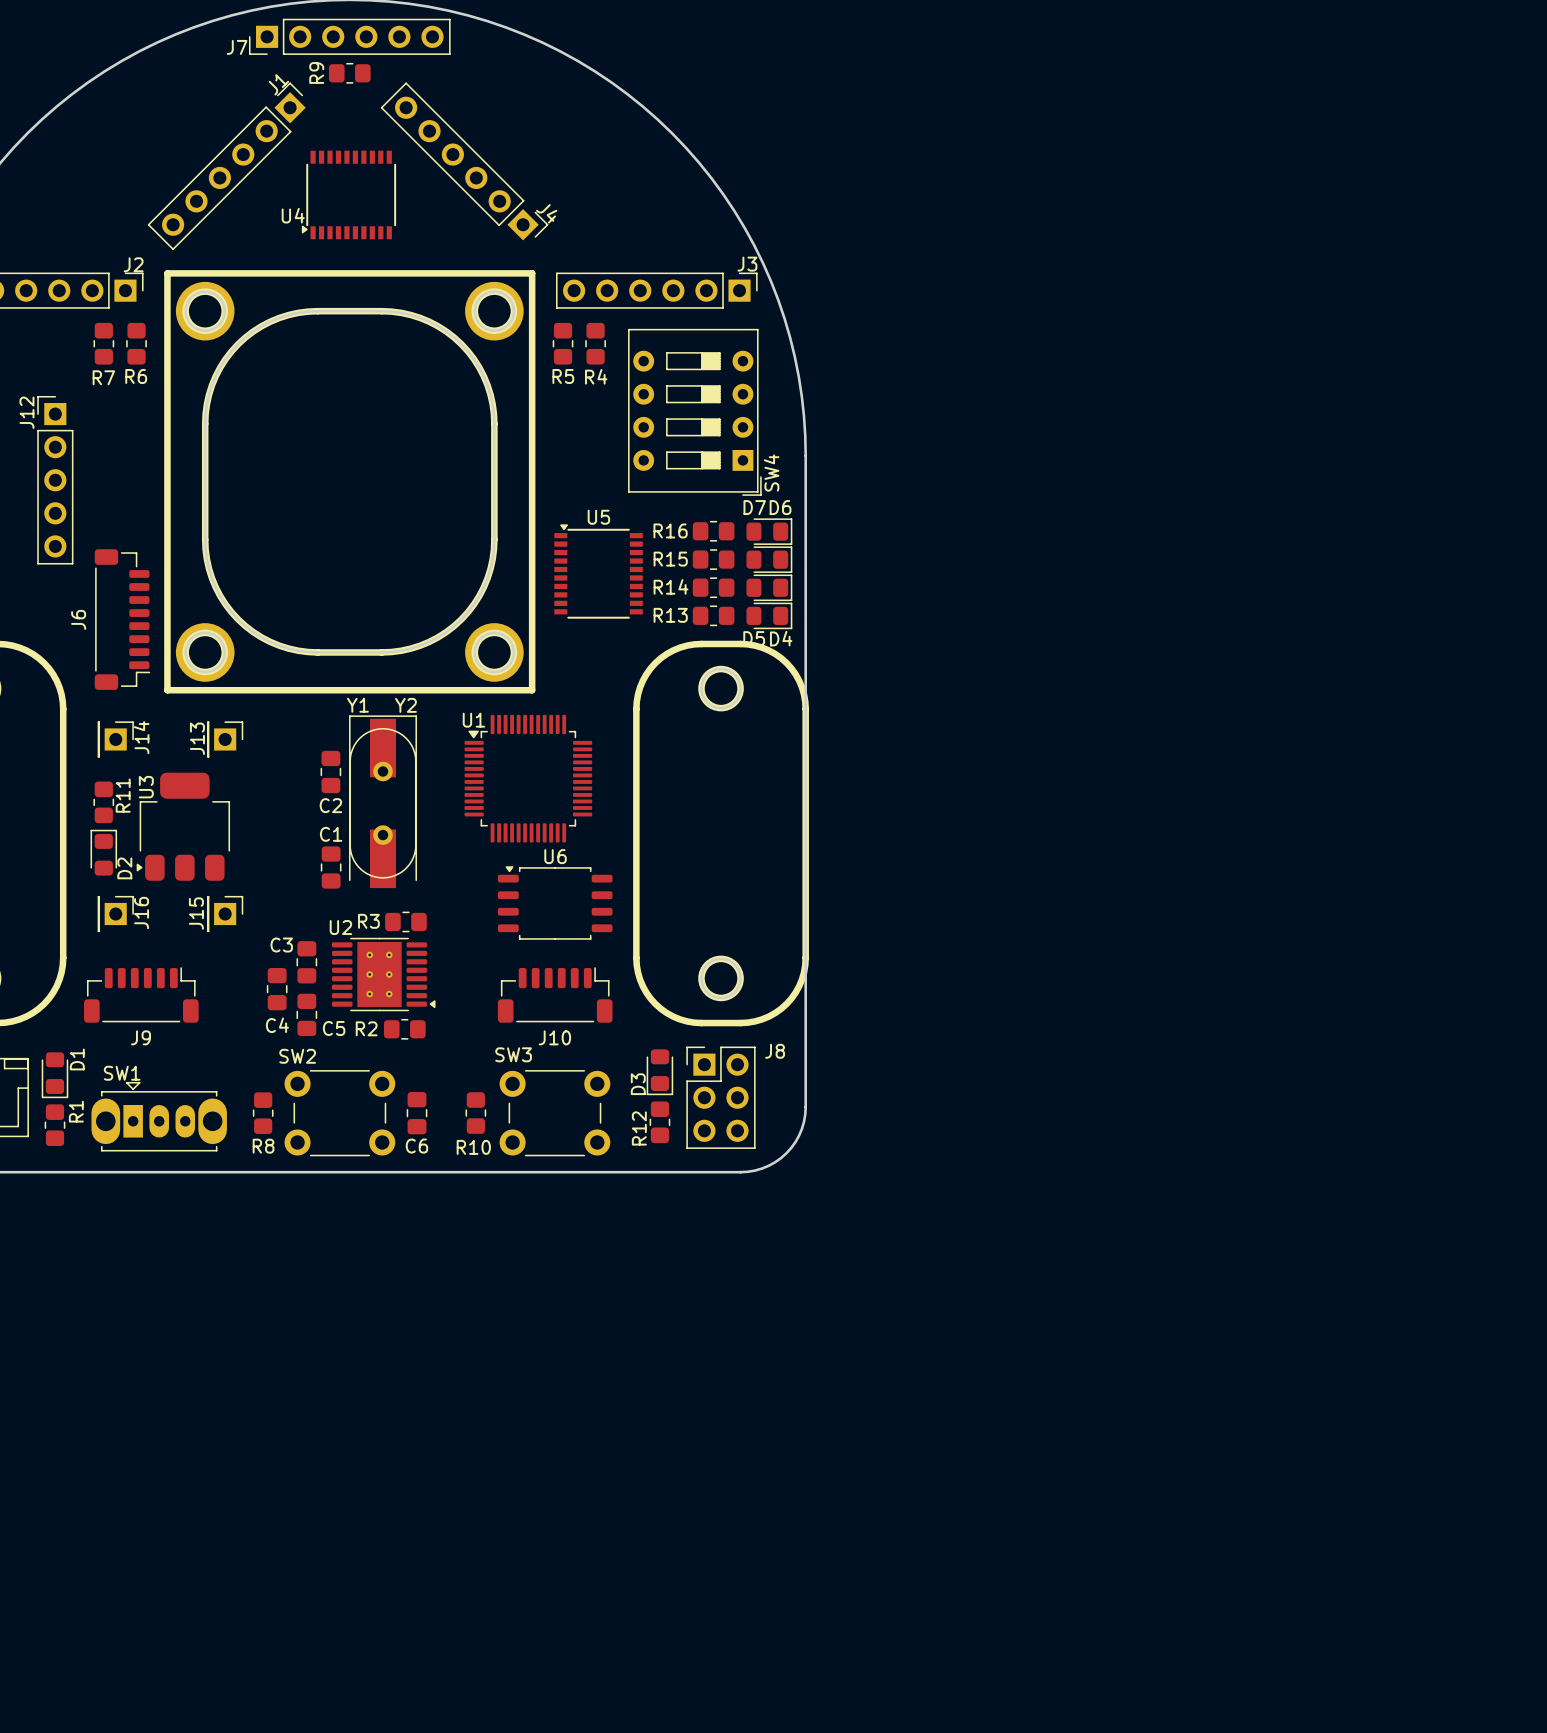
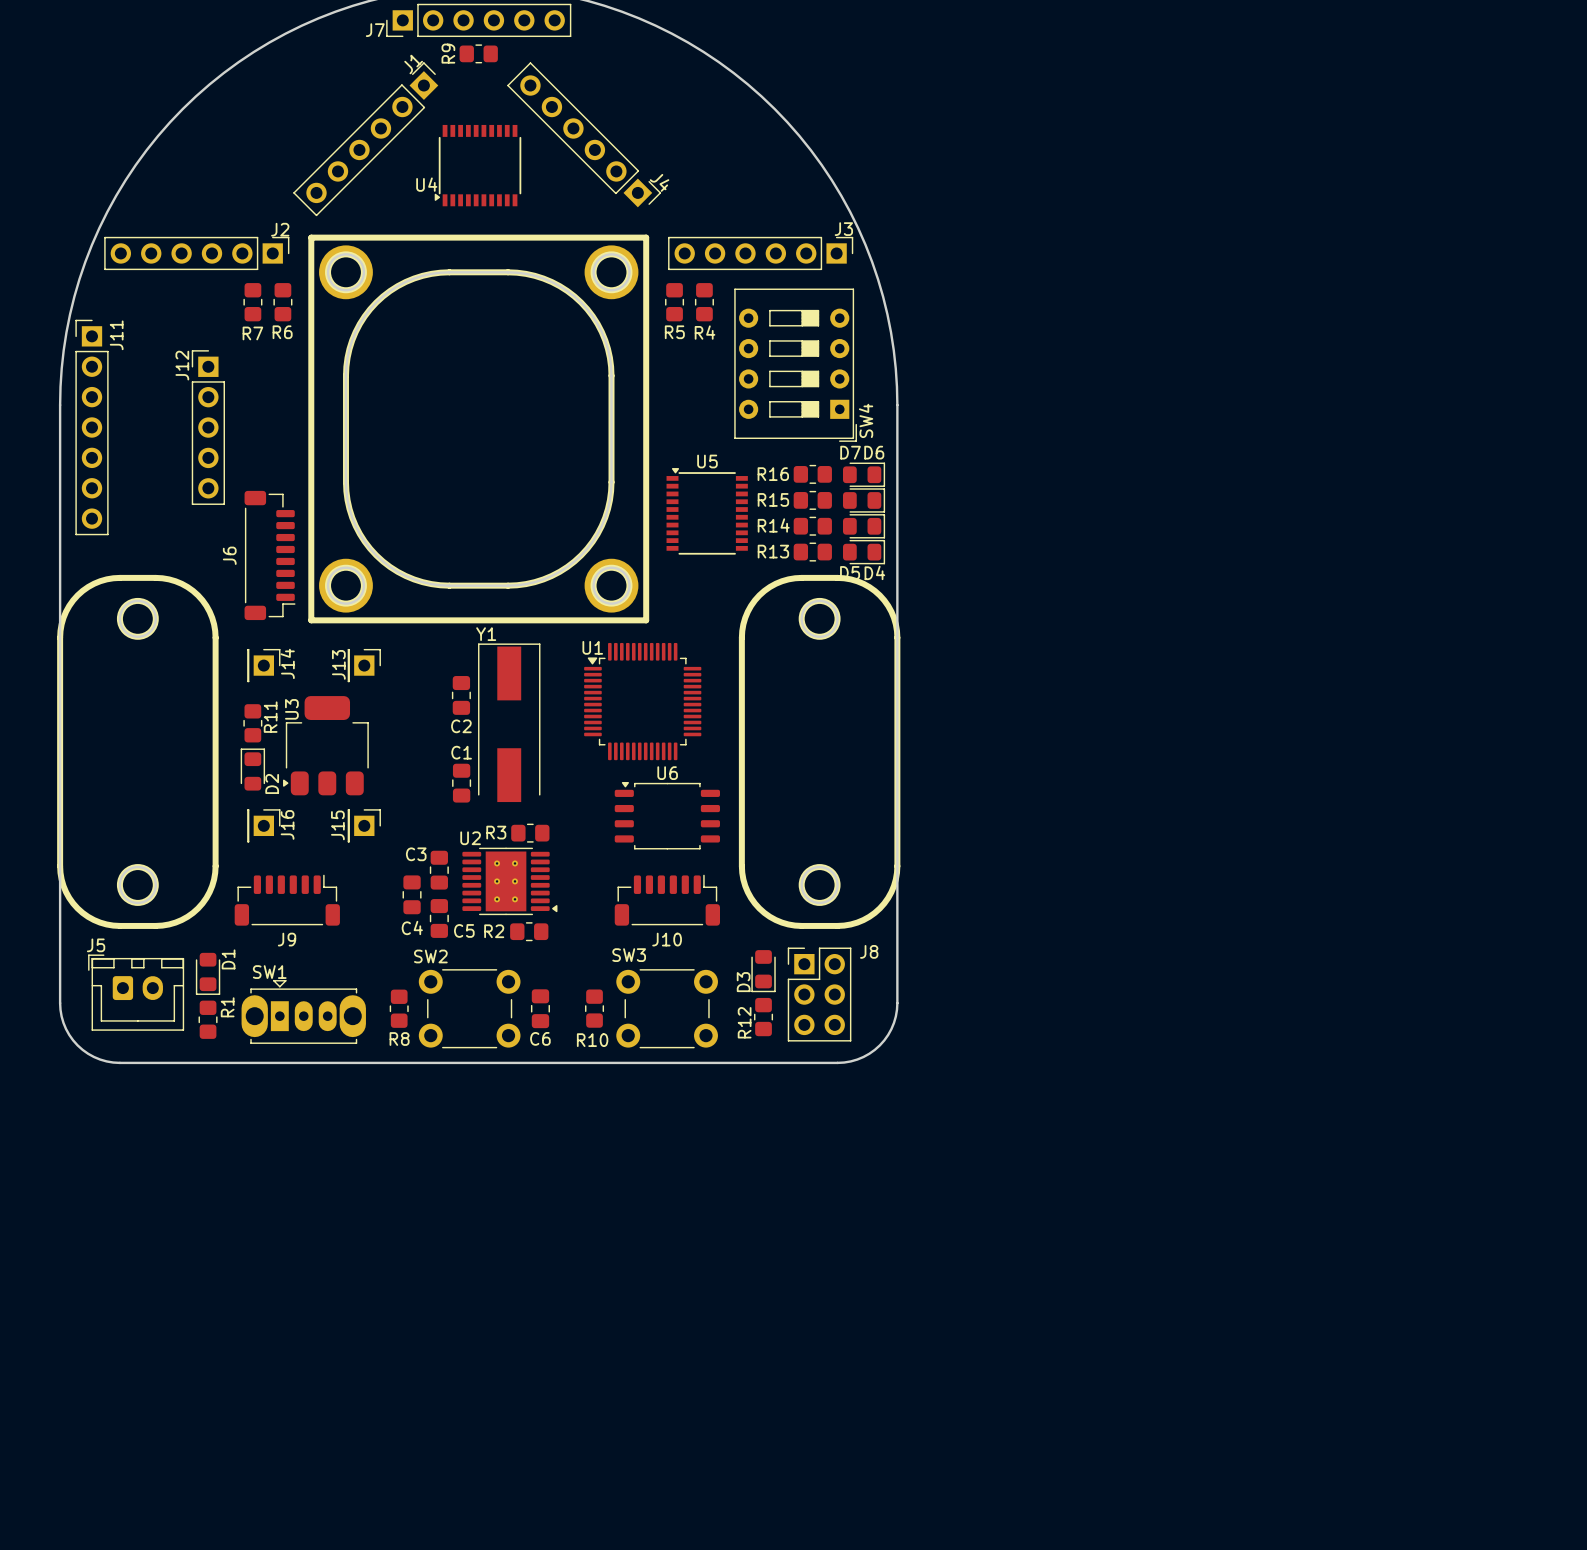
Y2: (383, 803) -> none

